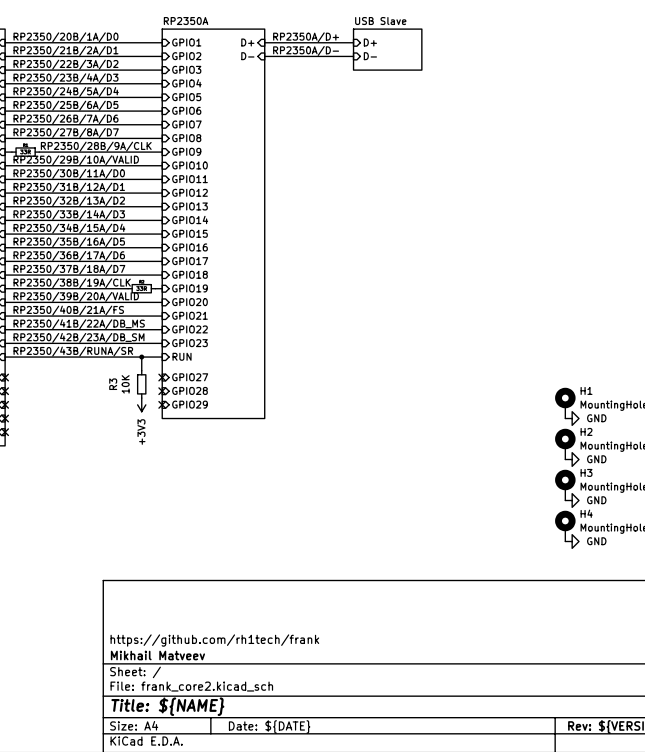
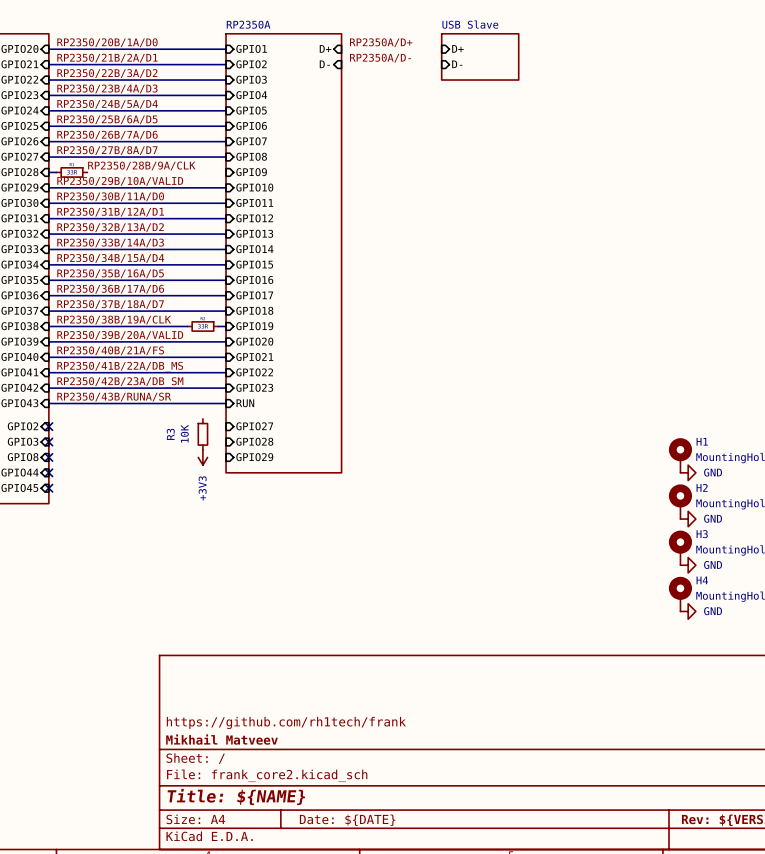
wire: (264, 42) (353, 42) -> none
wire: (264, 56) (353, 56) -> none
wire: (39, 152) (162, 152) -> none
wire: (141, 357) (141, 370) -> none
junction: (141, 357) -> none
no-connect mark: (162, 377) -> none
no-connect mark: (162, 391) -> none
no-connect mark: (162, 404) -> none

